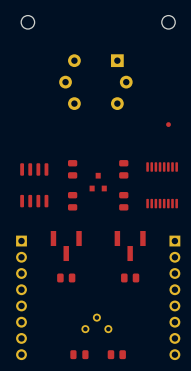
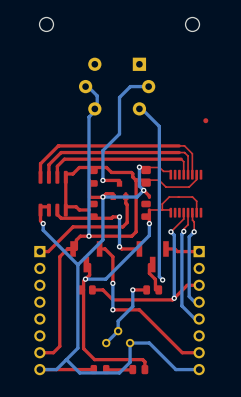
bottom track: none -> (87, 86) (97, 95) (97, 108) (88, 117) (88, 236)
bottom track: none -> (151, 86) (130, 86) (119, 97) (119, 133) (102, 150) (102, 180)
bottom track: none -> (141, 108) (159, 126) (159, 276) (162, 279)
part position: (168, 124) -> (205, 120)
top track: none -> (139, 167) (159, 167) (163, 171) (170, 171)
bottom track: none -> (139, 167) (139, 186) (143, 190) (137, 197) (102, 197) (102, 239) (77, 264)
via: none -> (139, 167)
top track: none -> (183, 171) (183, 161) (181, 159) (64, 159) (57, 166) (57, 173)
top track: none -> (188, 171) (188, 156) (184, 152) (61, 152) (48, 164) (48, 173)
top track: none -> (192, 171) (192, 153) (184, 145) (58, 145) (40, 163) (40, 173)
top track: none -> (196, 171) (196, 179) (189, 187) (165, 187) (159, 180) (135, 180) (131, 172) (111, 172) (106, 167) (79, 167) (72, 173) (65, 173) (65, 206) (89, 209)
top track: none -> (89, 180) (89, 197) (102, 197) (106, 193) (113, 193)
via: none -> (102, 180)
top track: none -> (119, 180) (102, 180)
top track: none -> (136, 180) (136, 231) (131, 236) (80, 236) (76, 240) (76, 248) (67, 248) (59, 256) (59, 346) (53, 352) (39, 352)
top track: none -> (143, 190) (149, 197)
via: none -> (143, 190)
top track: none -> (125, 193) (127, 222) (122, 226) (73, 226) (48, 251) (36, 251)
via: none -> (102, 197)
top track: none -> (48, 206) (40, 206) (40, 220) (43, 223)
top track: none -> (57, 206) (57, 214) (61, 218) (119, 216)
top track: none -> (170, 209) (149, 209) (149, 223)
top track: none -> (183, 209) (183, 219) (170, 231)
top track: none -> (188, 209) (188, 224) (183, 231)
top track: none -> (192, 209) (194, 231)
top track: none -> (196, 209) (196, 201) (192, 197) (169, 197) (162, 204) (162, 209)
bottom track: none -> (119, 216) (119, 246)
via: none -> (119, 216)
bottom track: none -> (43, 223) (43, 230) (77, 264)
via: none -> (43, 223)
bottom track: none -> (149, 223) (149, 235) (105, 279) (85, 279)
via: none -> (149, 223)
bottom track: none -> (183, 231) (181, 234) (181, 305) (195, 319) (202, 319)
via: none -> (183, 231)
bottom track: none -> (170, 231) (174, 235) (174, 298)
via: none -> (170, 231)
bottom track: none -> (194, 231) (189, 236) (189, 296) (194, 302) (202, 302)
via: none -> (194, 231)
via: none -> (88, 236)
top track: none -> (119, 246) (121, 248) (136, 248)
via: none -> (119, 246)
top track: none -> (102, 248) (112, 256) (112, 283)
top track: none -> (165, 248) (174, 248) (177, 251) (202, 251)
bottom track: none -> (77, 264) (77, 348) (56, 369) (36, 369)
top track: none -> (89, 264) (89, 275) (83, 281) (83, 348) (94, 359) (142, 359) (144, 361) (144, 369)
top track: none -> (149, 264) (149, 273) (155, 279) (155, 289)
via: none -> (85, 279)
via: none -> (162, 279)
bottom track: none -> (112, 283) (112, 309)
via: none -> (112, 283)
top track: none -> (199, 285) (187, 285) (172, 299) (112, 299) (102, 289) (92, 289)
bottom track: none -> (132, 289) (132, 306) (118, 321) (118, 331) (106, 343)
via: none -> (132, 289)
top track: none -> (143, 289) (132, 289)
via: none -> (174, 298)
top track: none -> (112, 309) (139, 309) (182, 352) (199, 352)
via: none -> (112, 309)
bottom track: none -> (66, 359) (79, 372) (119, 372) (130, 362) (130, 343) (149, 343) (175, 369) (202, 369)
top track: none -> (93, 369) (36, 369)
top track: none -> (106, 369) (132, 369)

